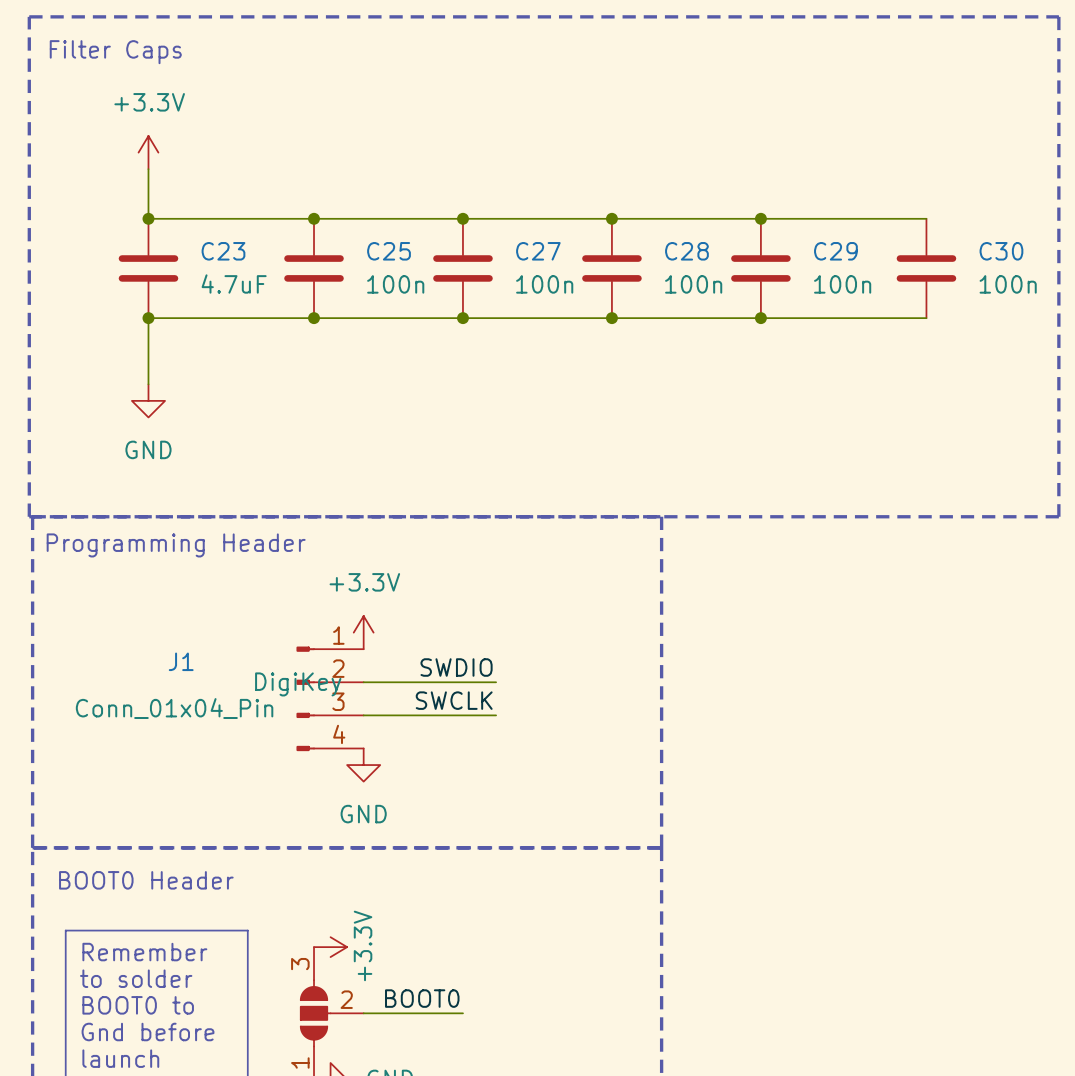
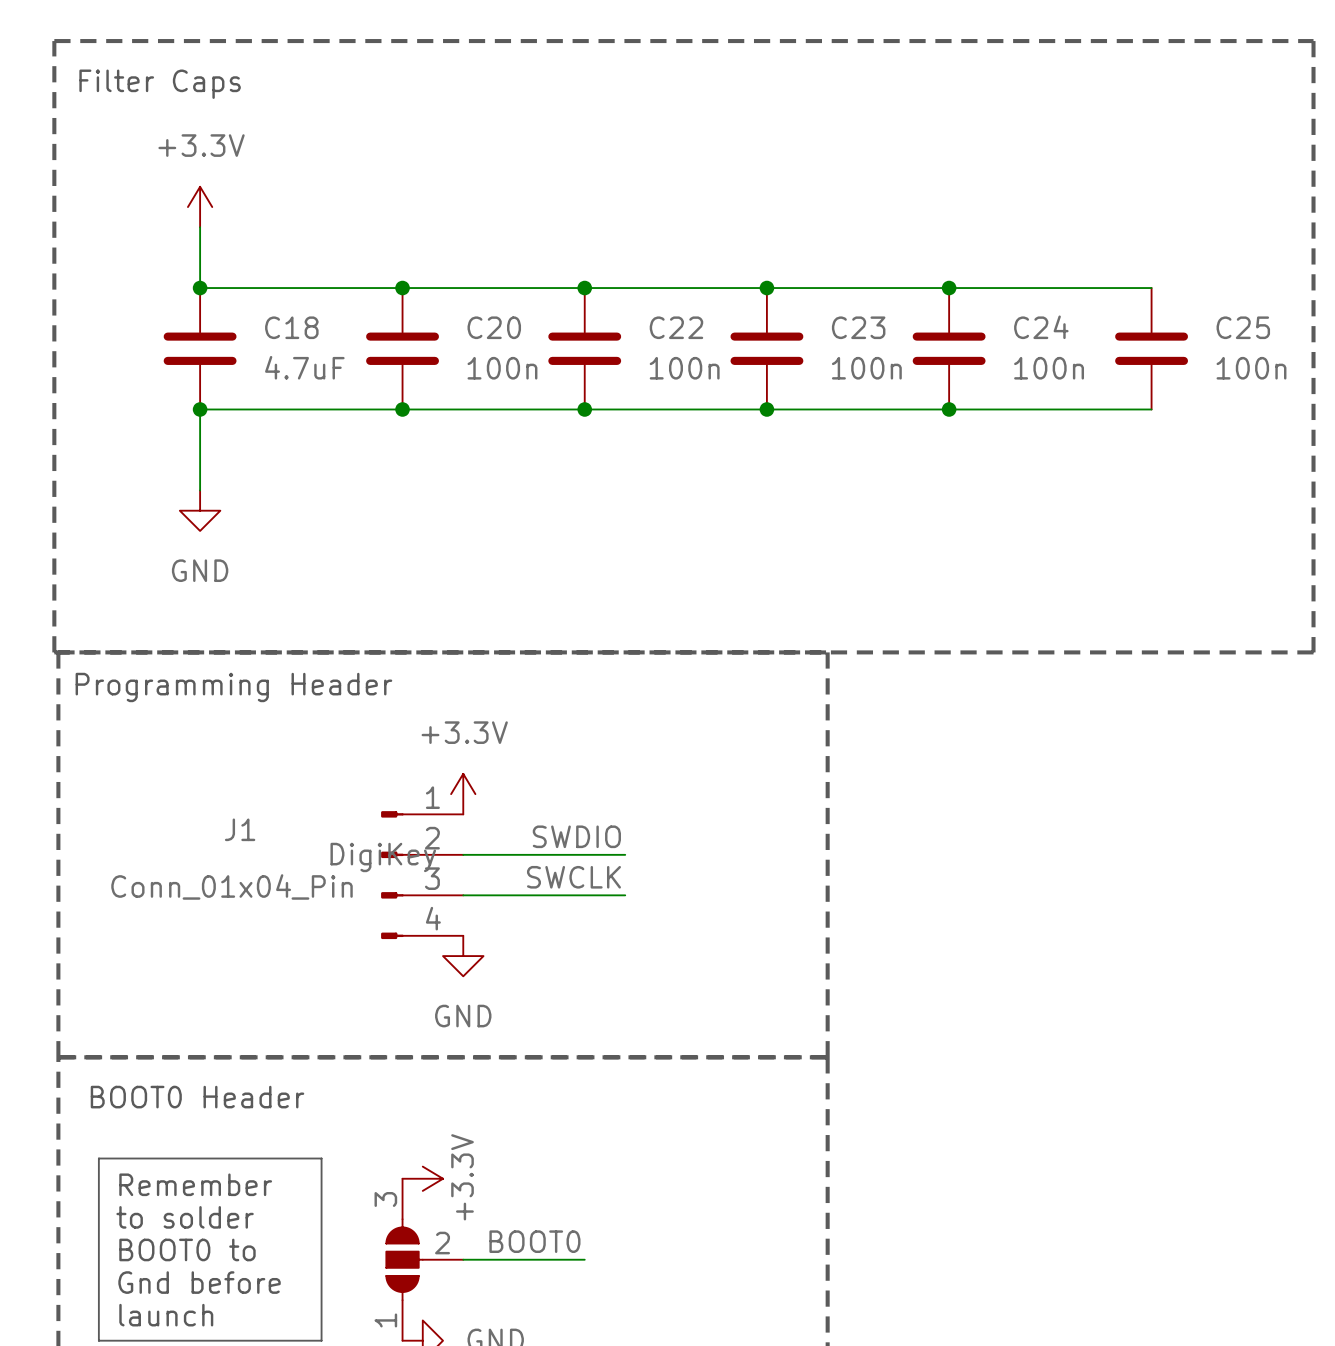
C23 name: C23 (223, 251) -> C18 (291, 327)
C25 name: C25 (389, 251) -> C20 (494, 327)
C27 name: C27 (538, 251) -> C22 (676, 327)
C28 name: C28 (686, 251) -> C23 (858, 327)
C29 name: C29 (835, 251) -> C24 (1041, 327)
C30 name: C30 (1001, 251) -> C25 (1243, 327)

